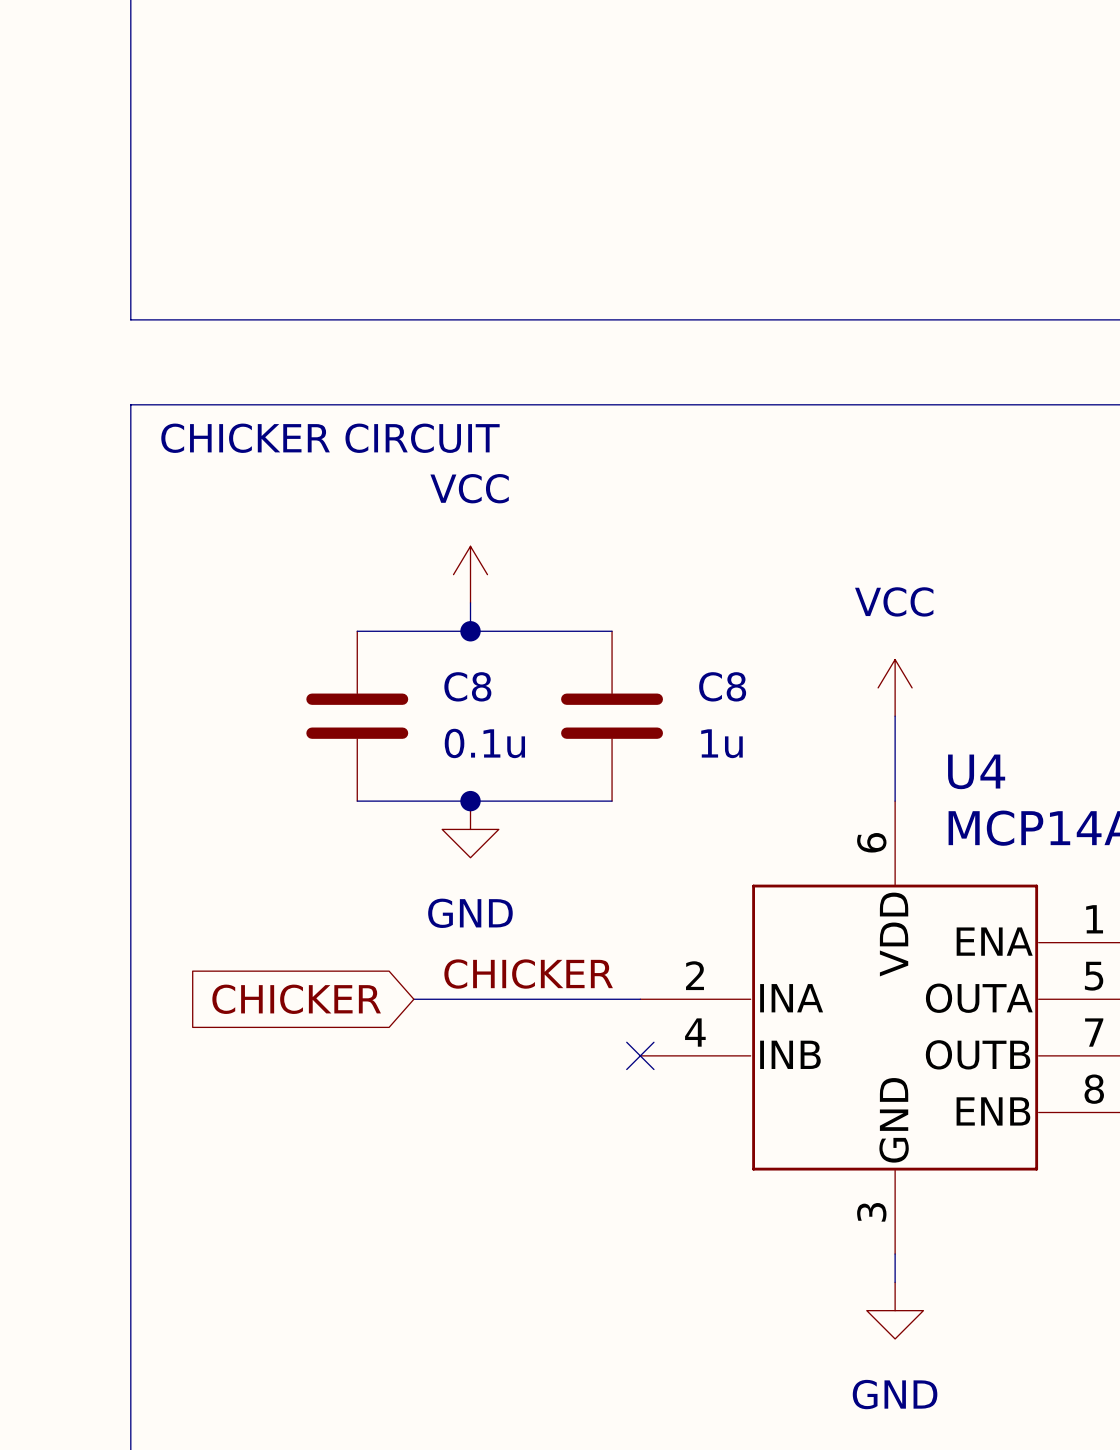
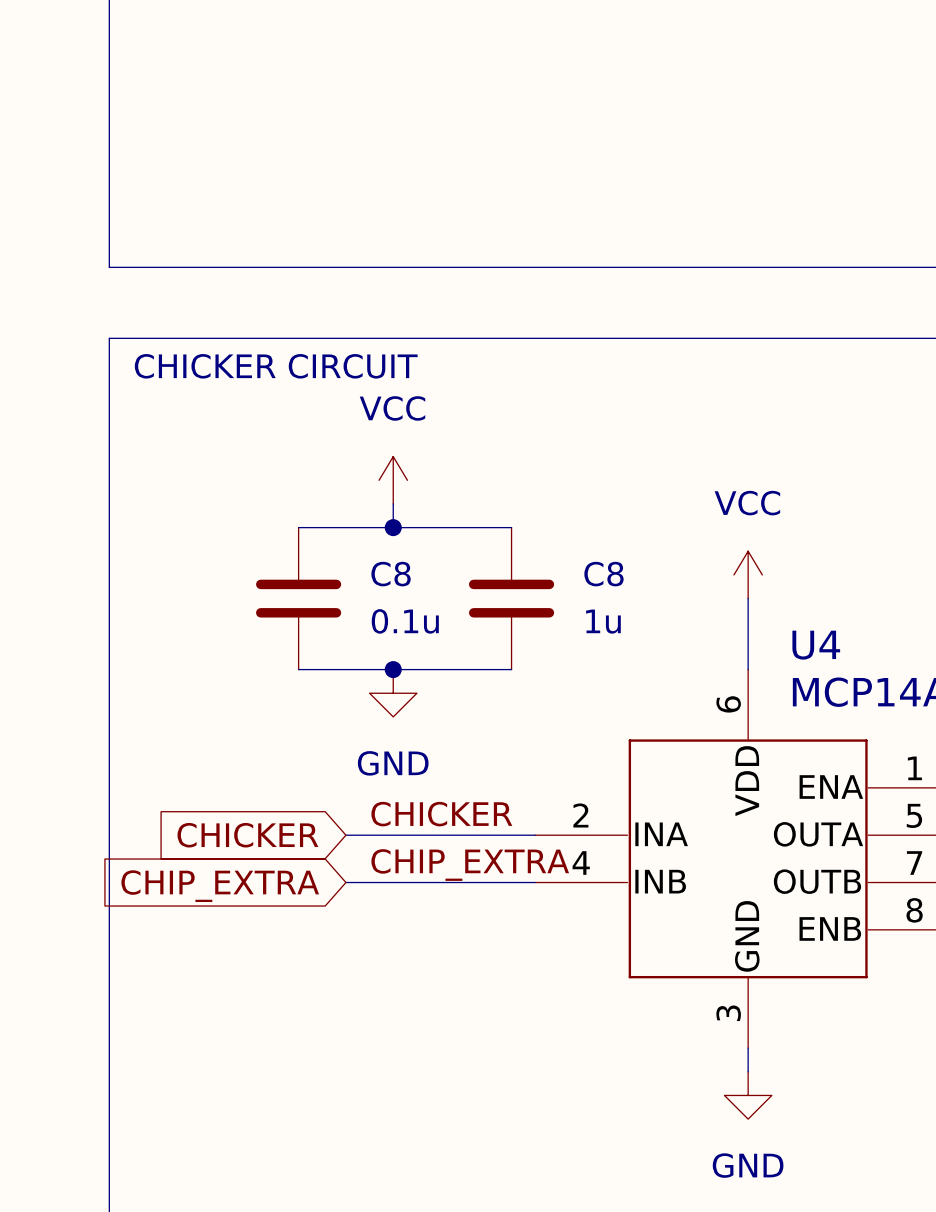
label: none -> CHIP_EXTRA (470, 865)
wire: none -> (345, 882) (535, 882)
no-connect mark: (640, 1055) -> none
global label: none -> CHIP_EXTRA (220, 886)

